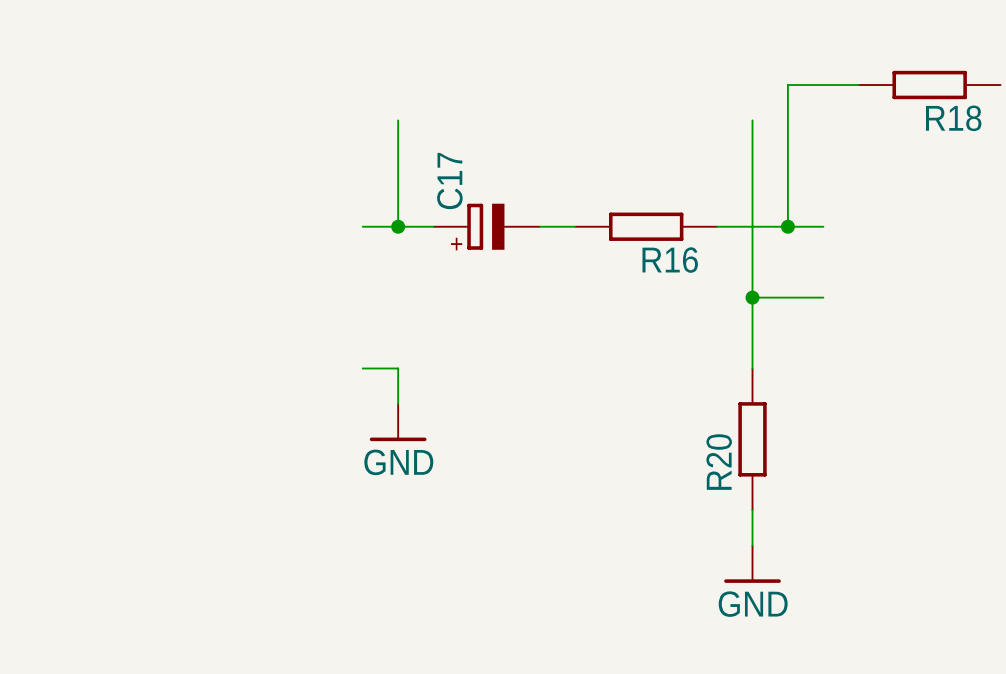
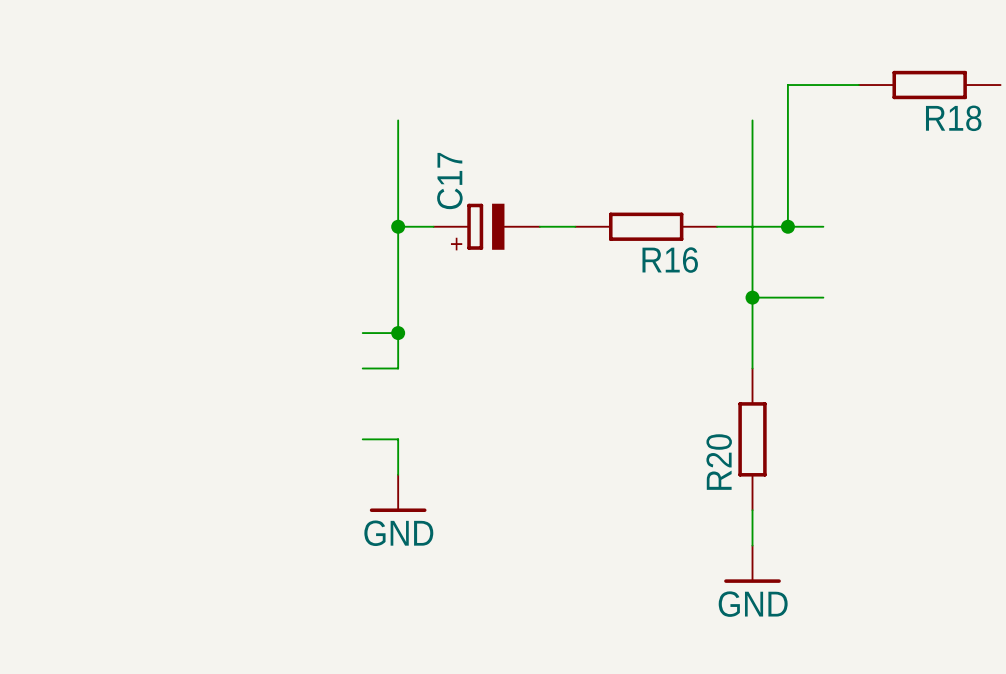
wire: (362, 226) (398, 226) -> (398, 368) (398, 226)
wire: none -> (362, 333) (398, 333)
junction: none -> (398, 333)
wire: (398, 368) (398, 403) -> none
power symbol position: GND (398, 422) -> GND (398, 493)
wire: none -> (362, 439) (398, 439) (398, 474)

